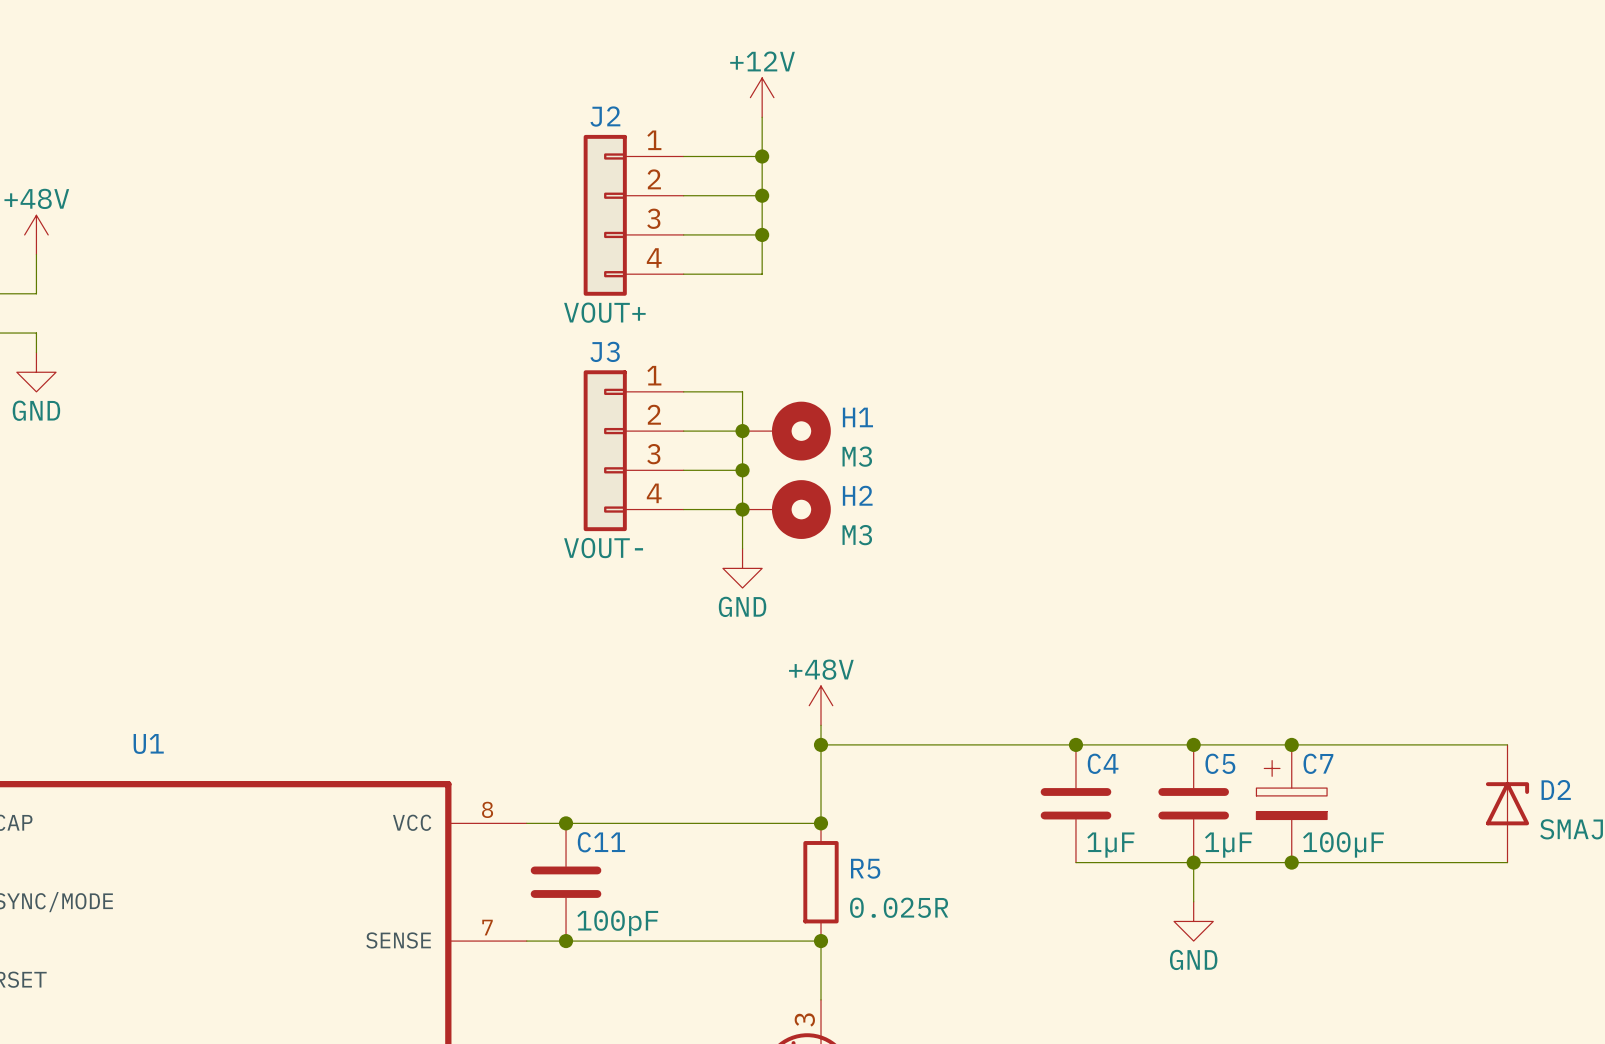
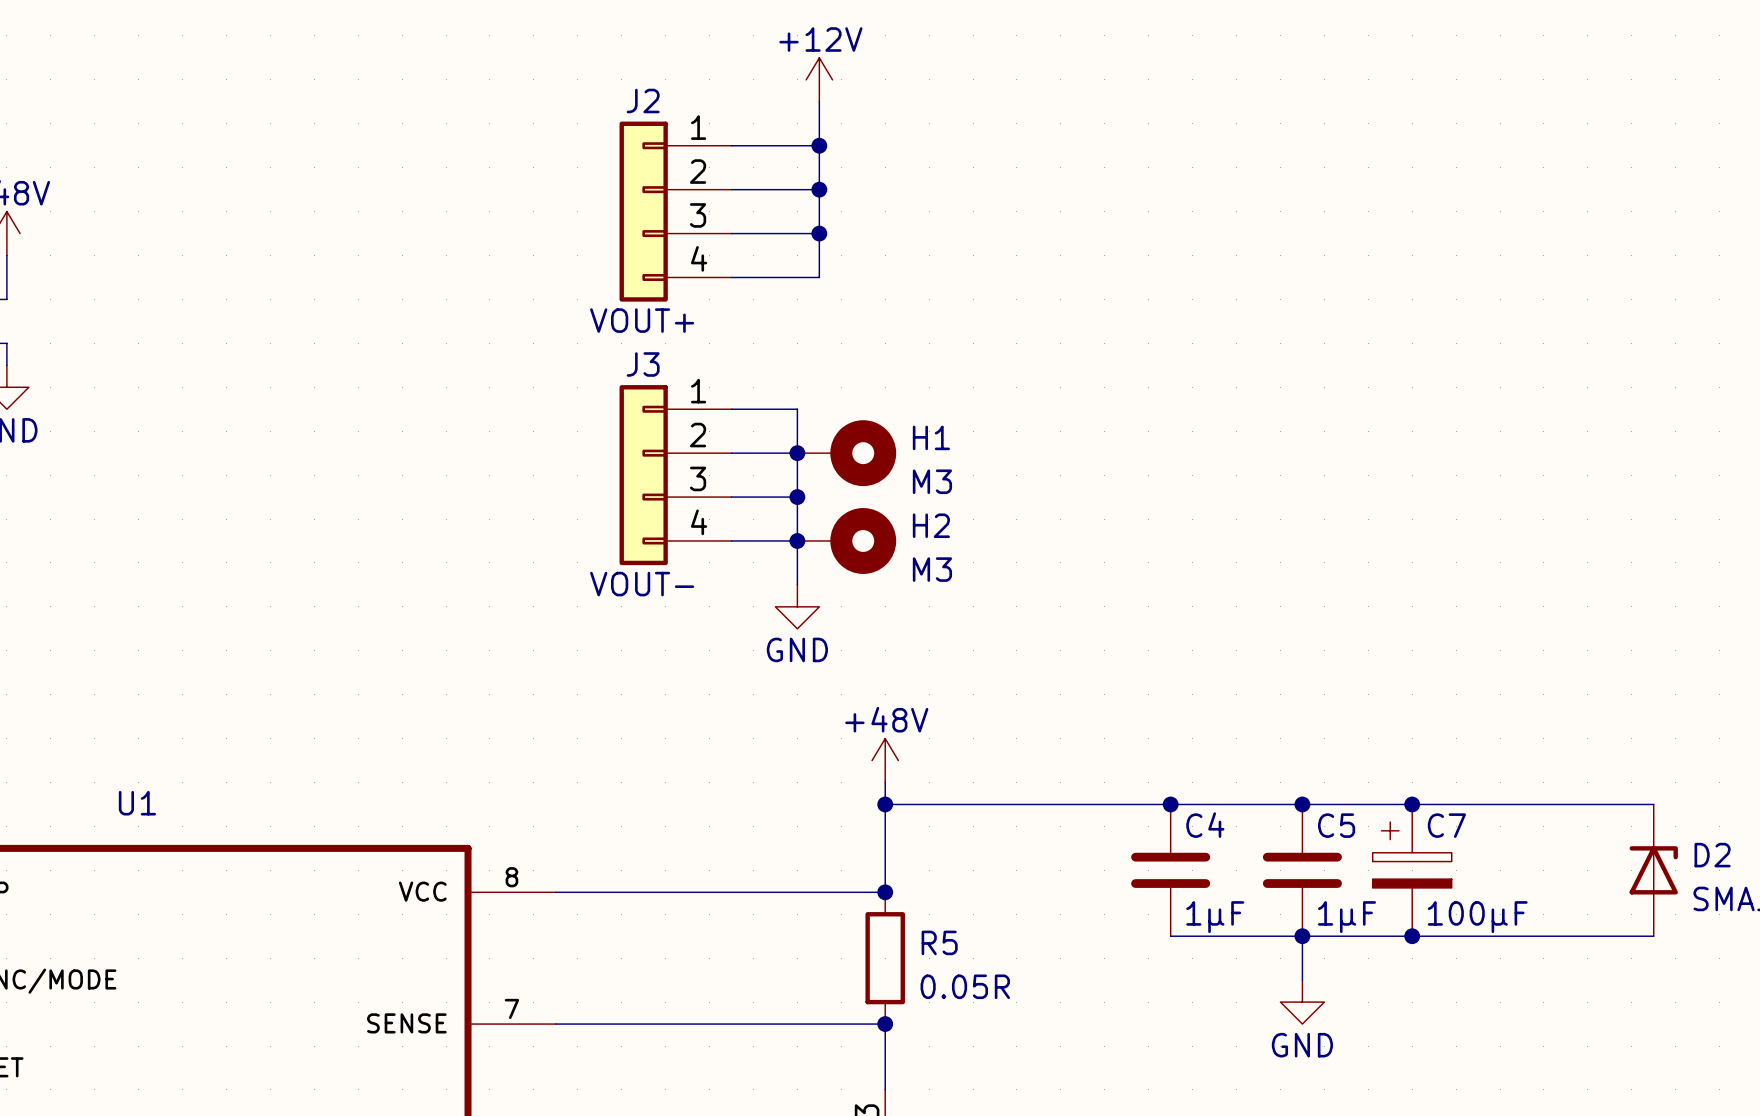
junction: (566, 823) -> none
C11: 100pF (566, 882) -> none
R5 value: 0.025R (899, 907) -> 0.05R (965, 986)
junction: (566, 941) -> none

